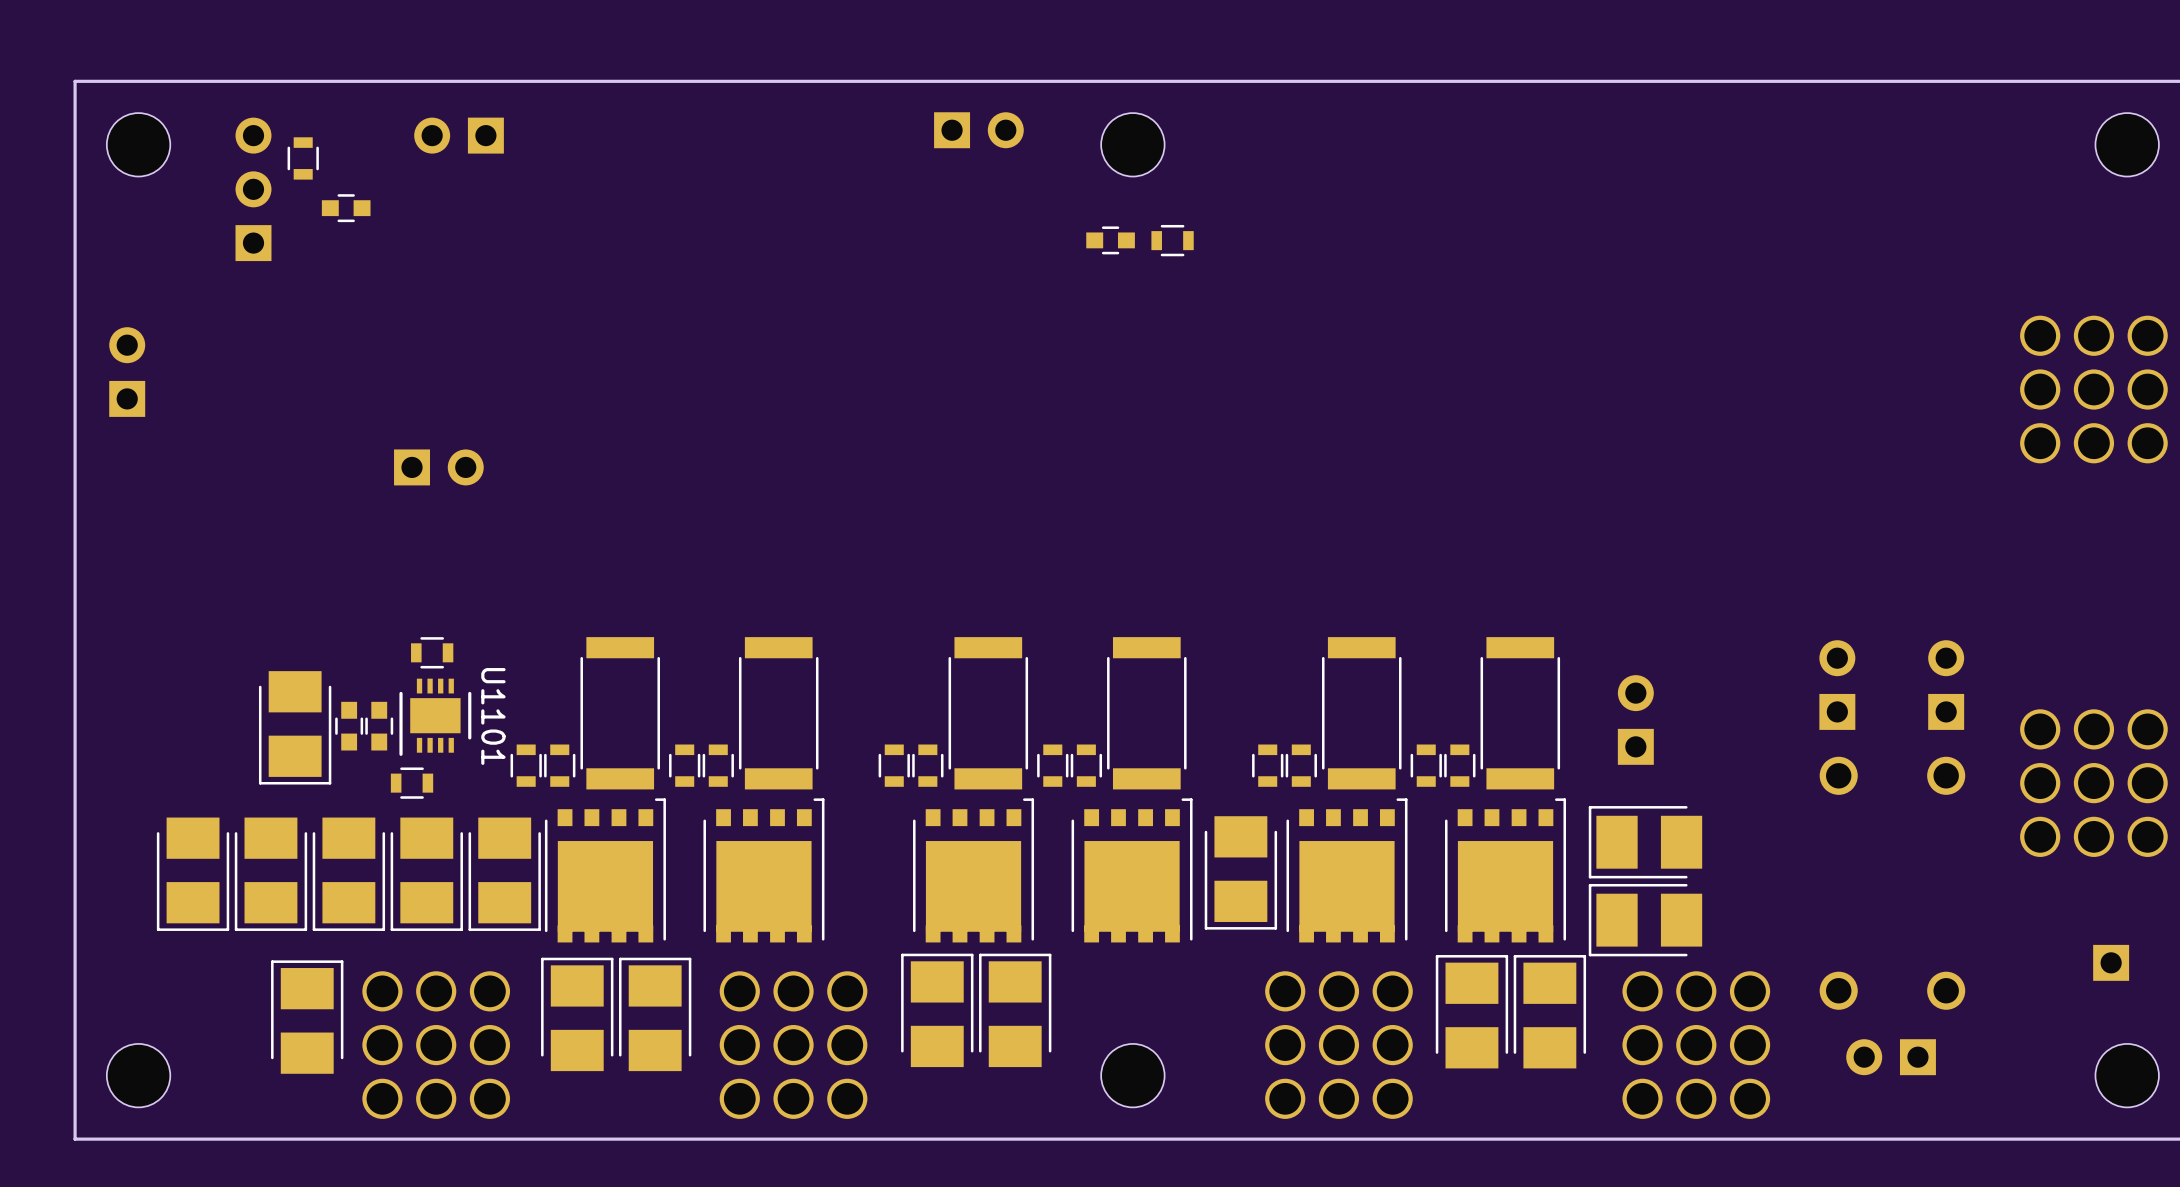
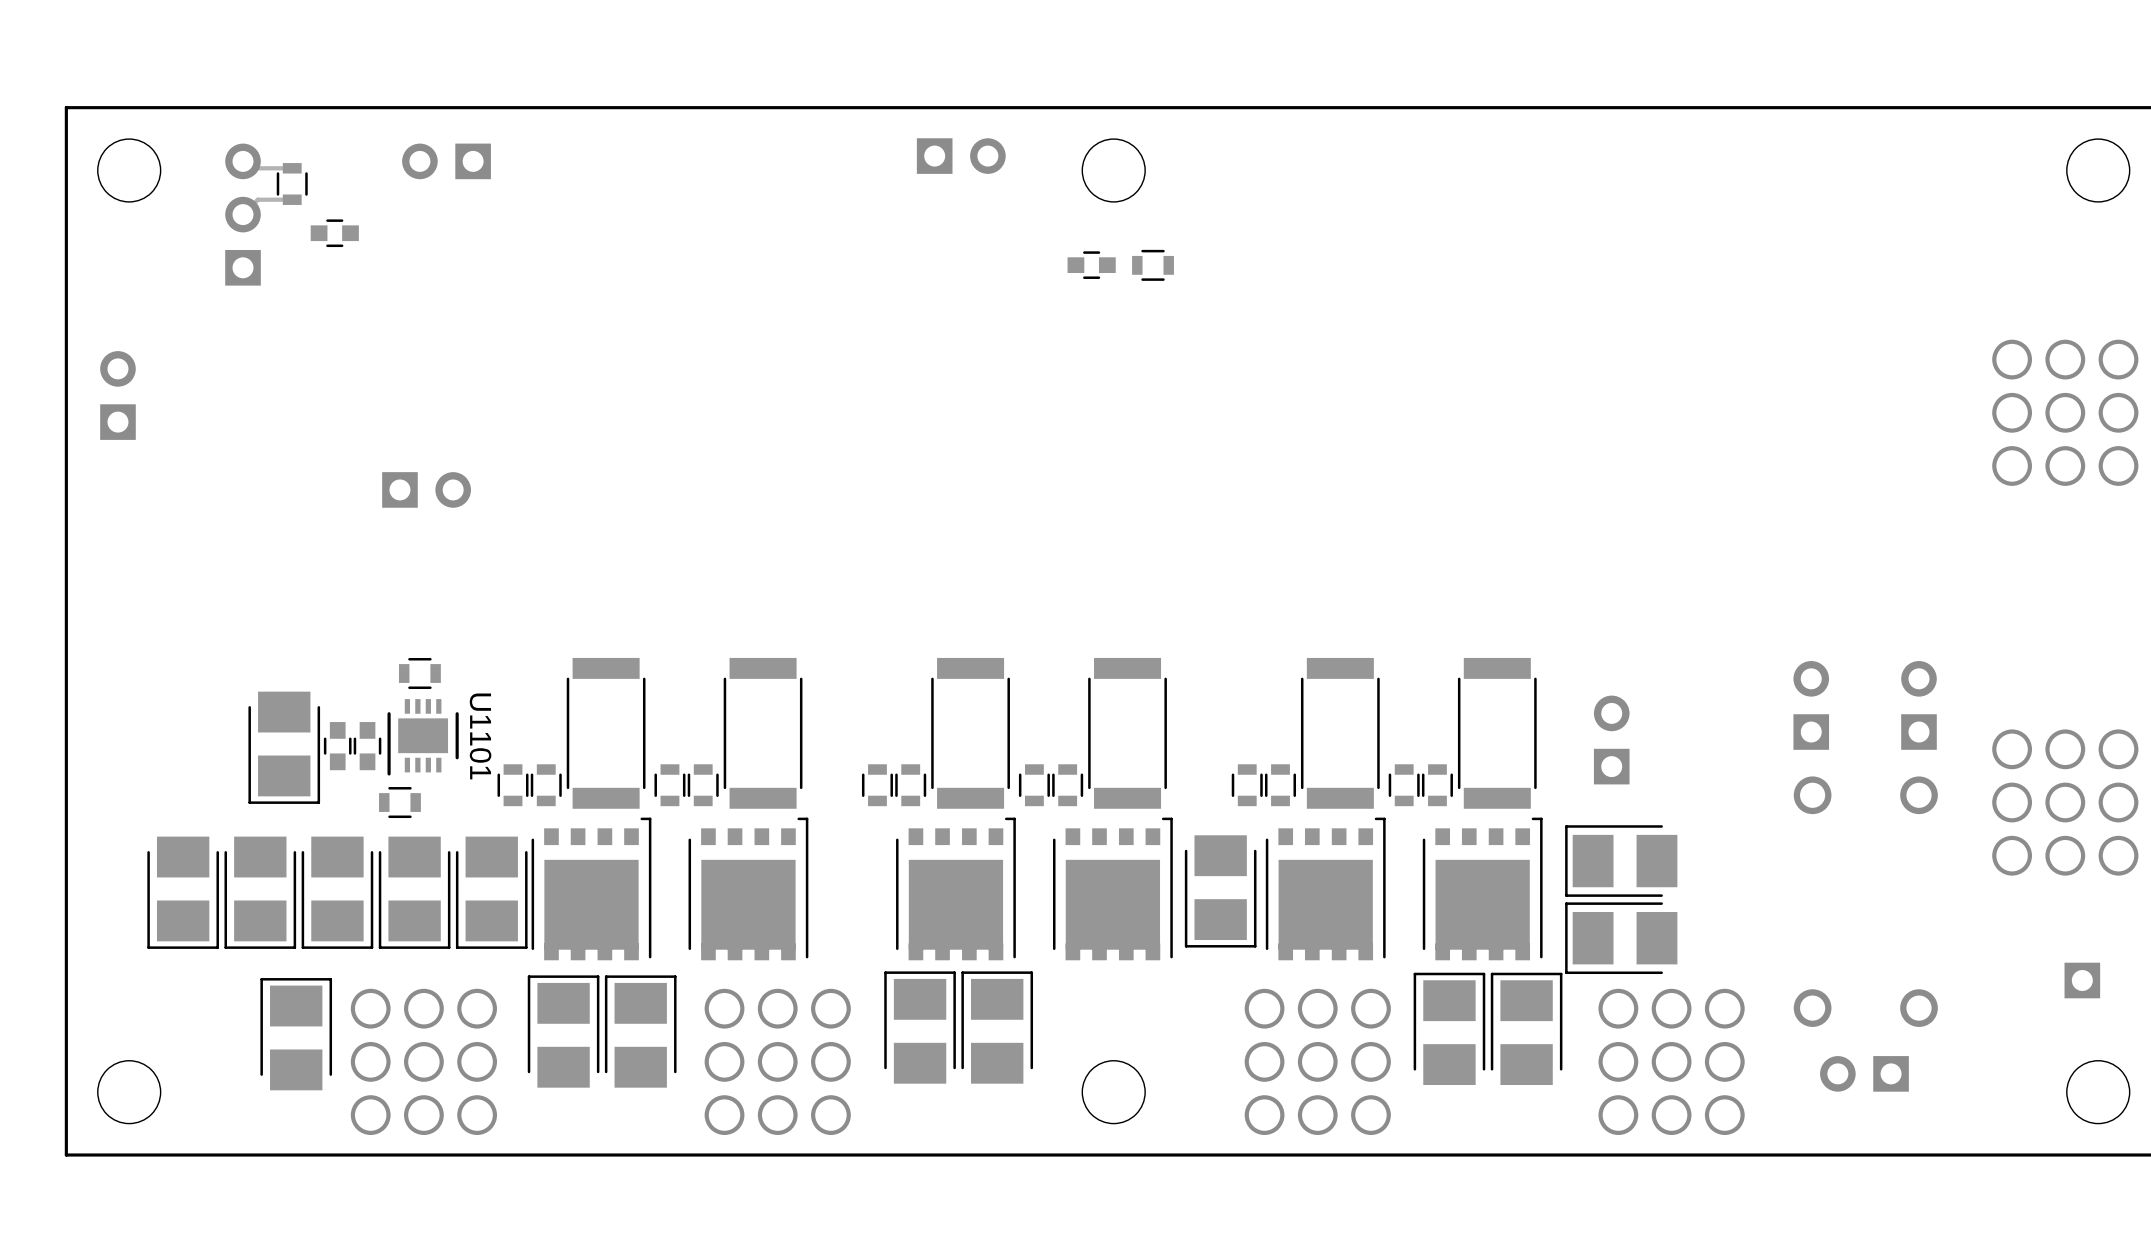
track: none -> (243, 161) (249, 168) (292, 168)
track: none -> (292, 199) (257, 199) (243, 214)

